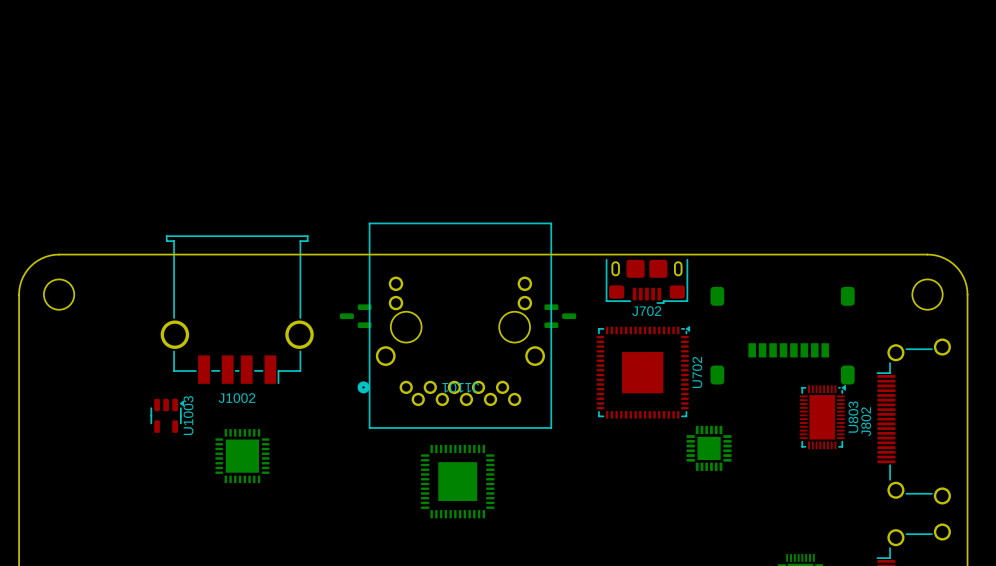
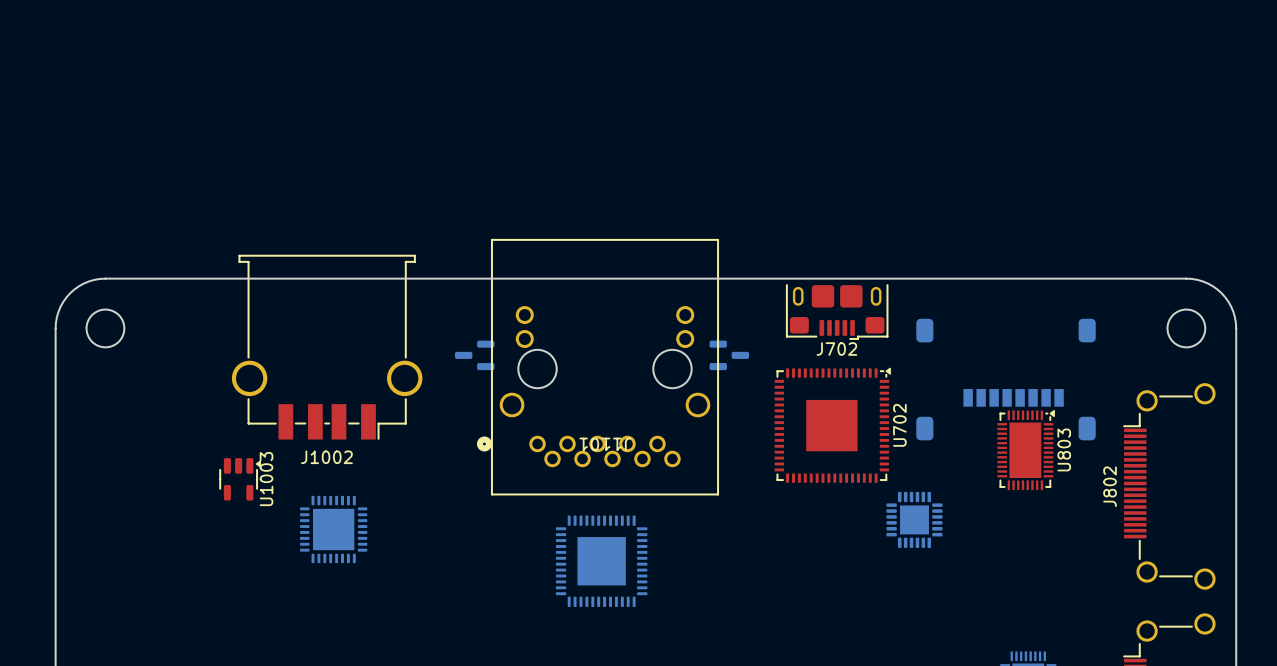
U803 position: (822, 417) -> (1026, 450)

